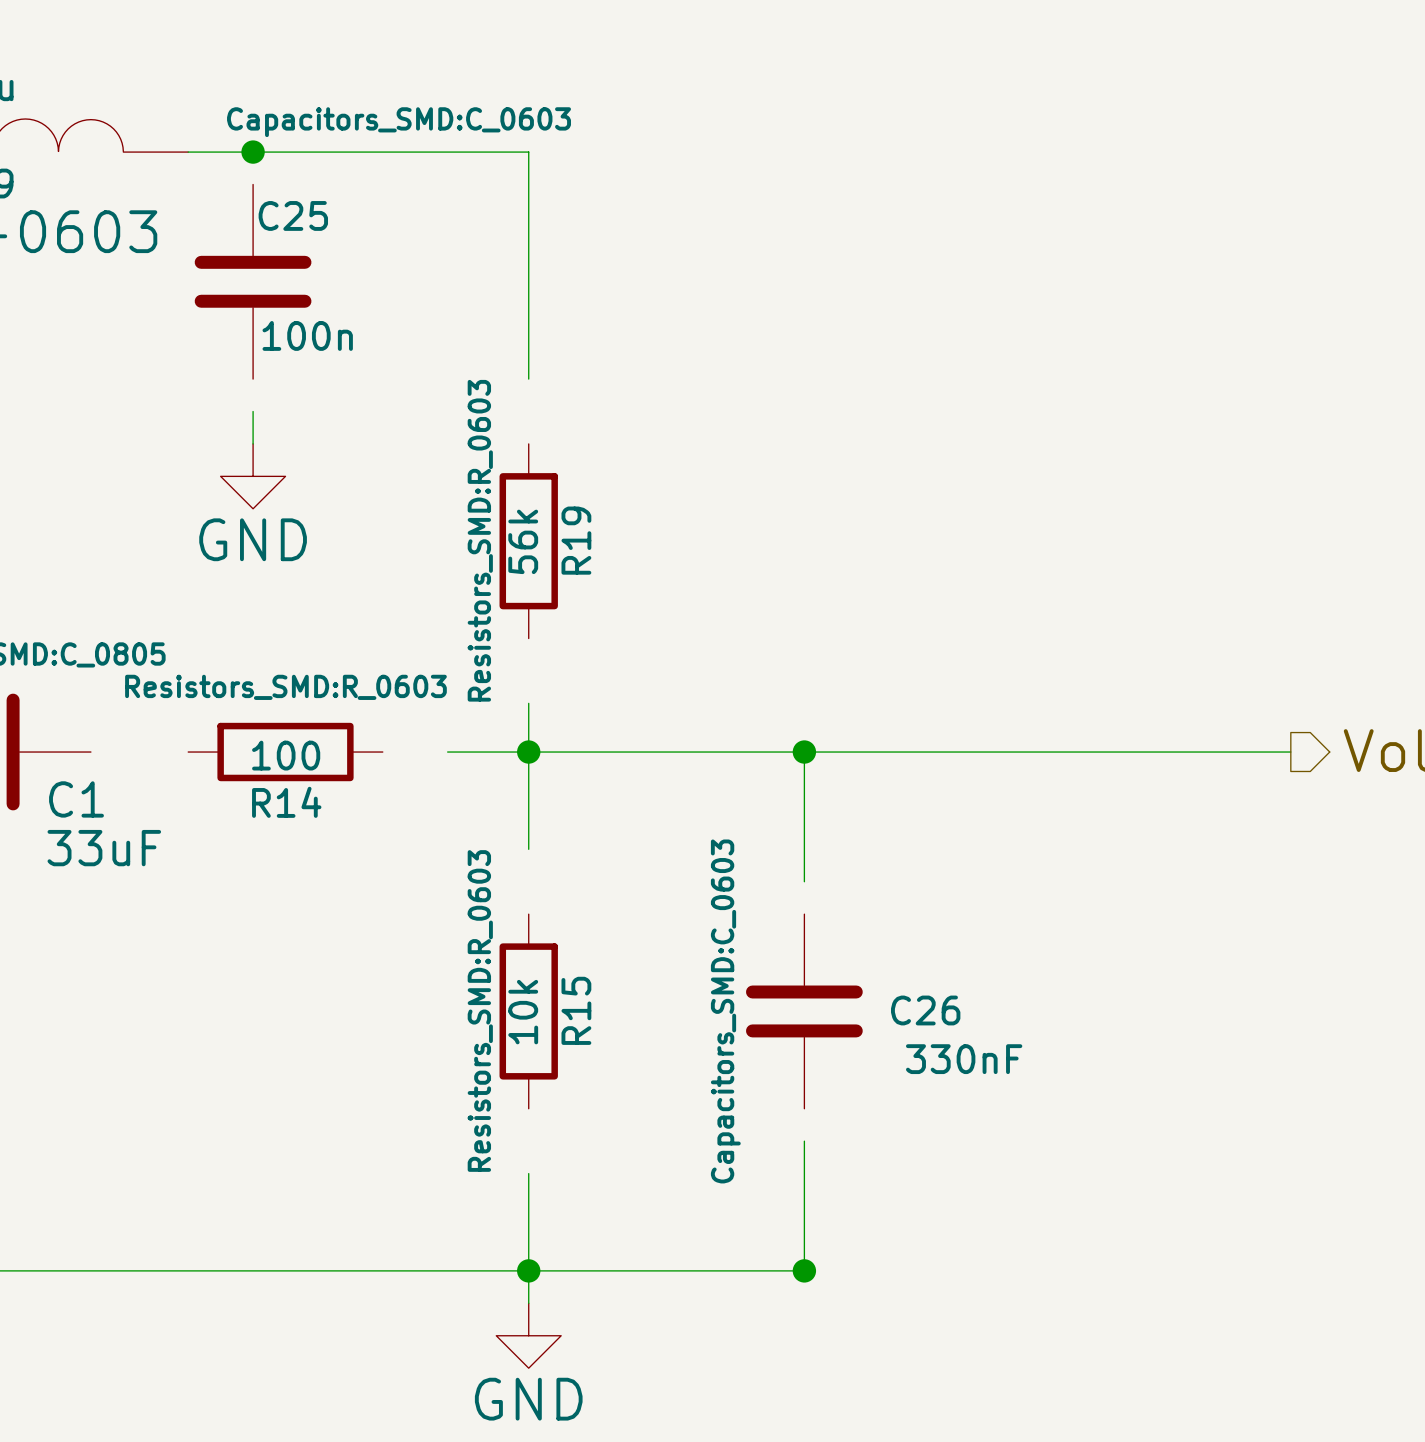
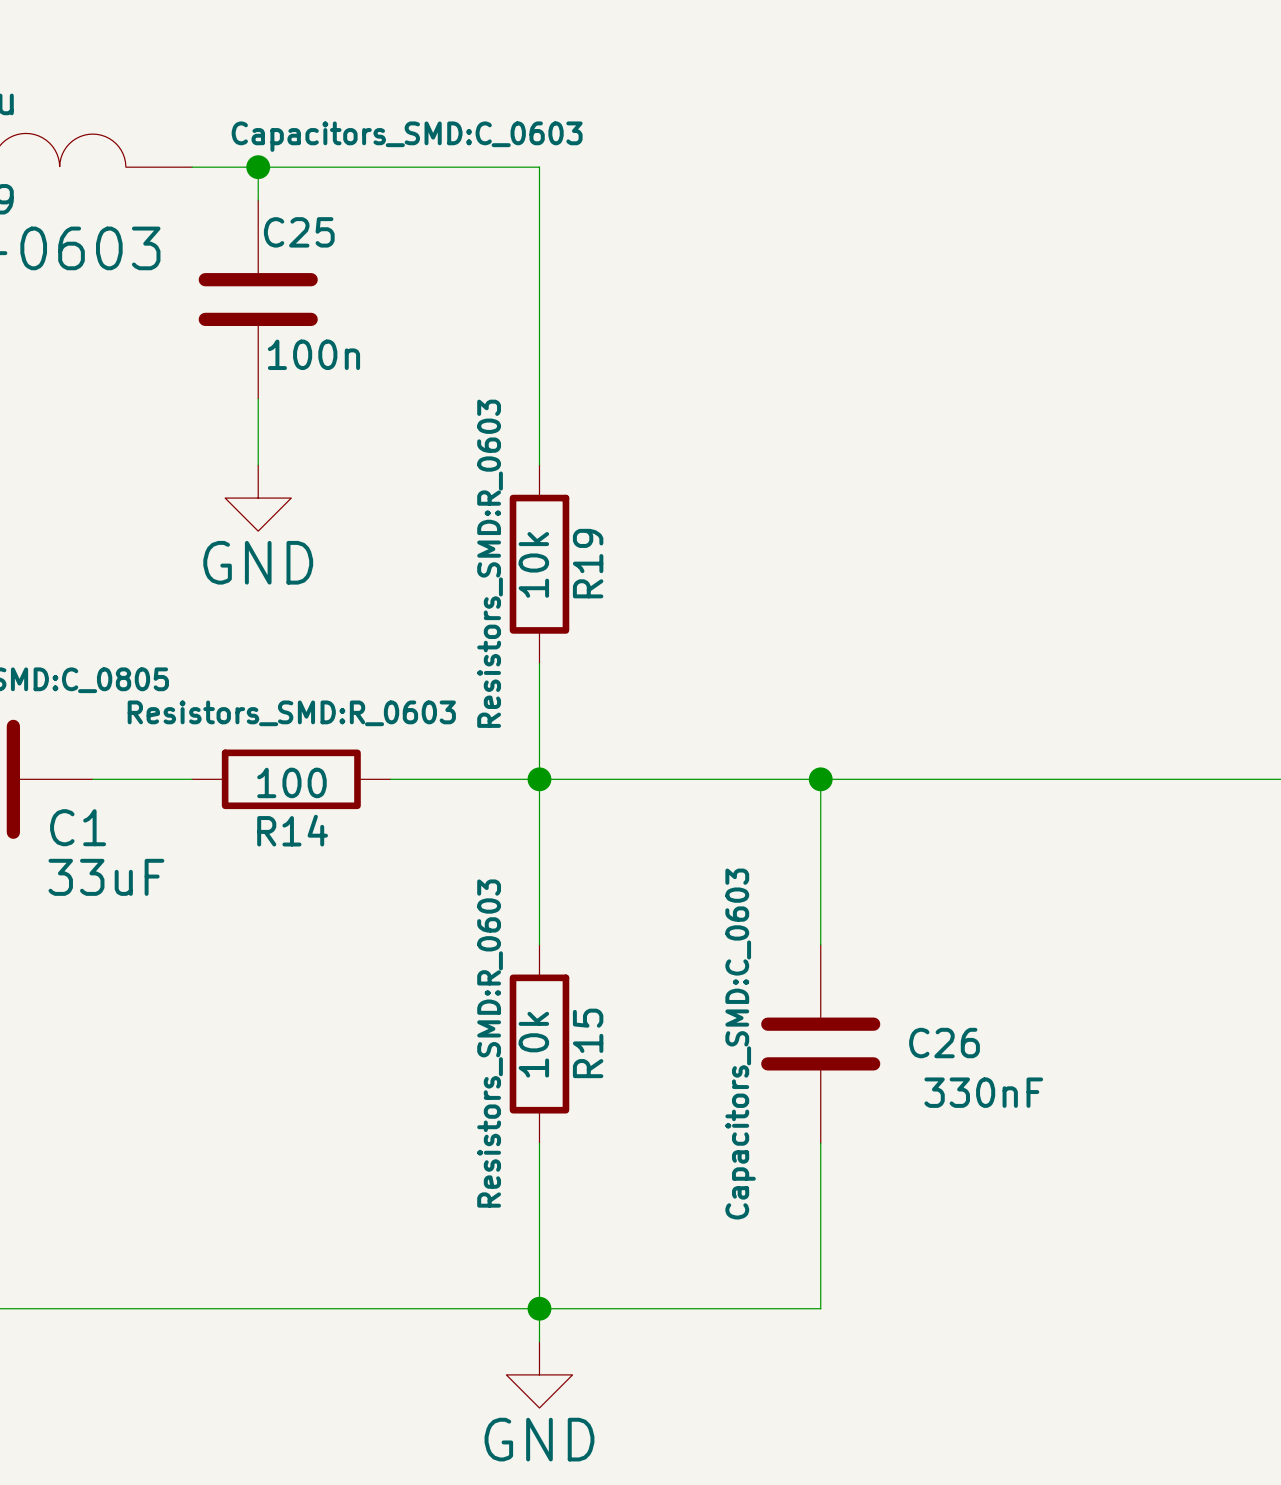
wire: none -> (258, 167) (258, 200)
wire: none -> (258, 398) (258, 431)
wire: none -> (539, 398) (539, 464)
R19 value: 56k (523, 541) -> 10k (533, 564)
wire: none -> (539, 663) (539, 729)
wire: none -> (92, 779) (192, 779)
wire: none -> (390, 779) (456, 779)
wire: none -> (539, 878) (539, 944)
wire: none -> (820, 911) (820, 944)
wire: none -> (539, 1143) (539, 1209)
wire: none -> (820, 1143) (820, 1176)
junction: (804, 1270) -> none

